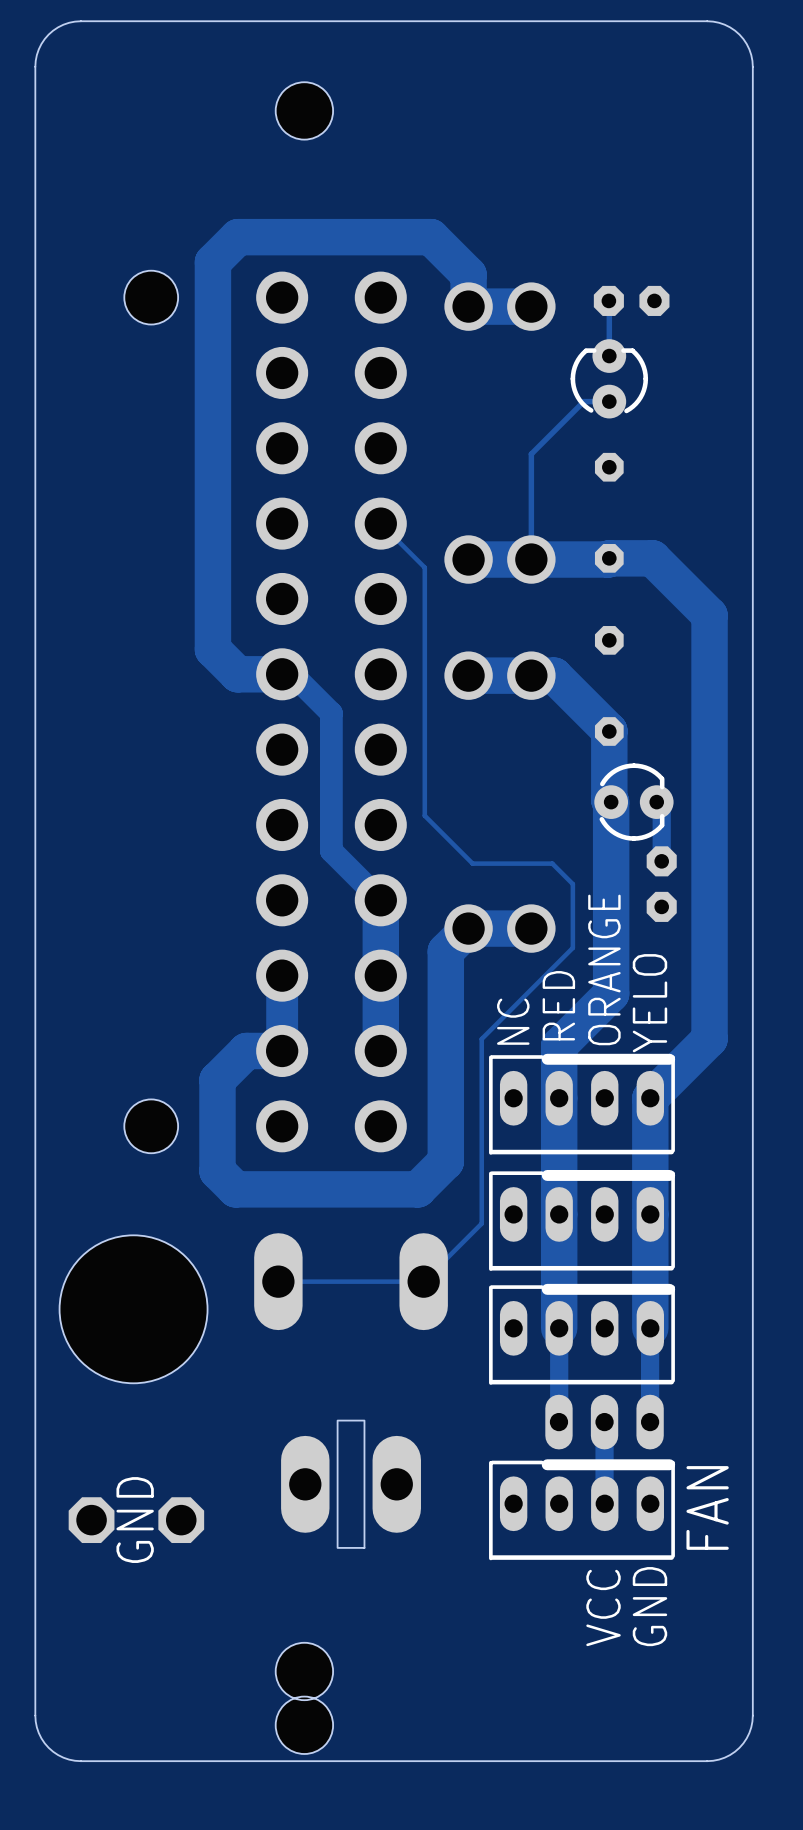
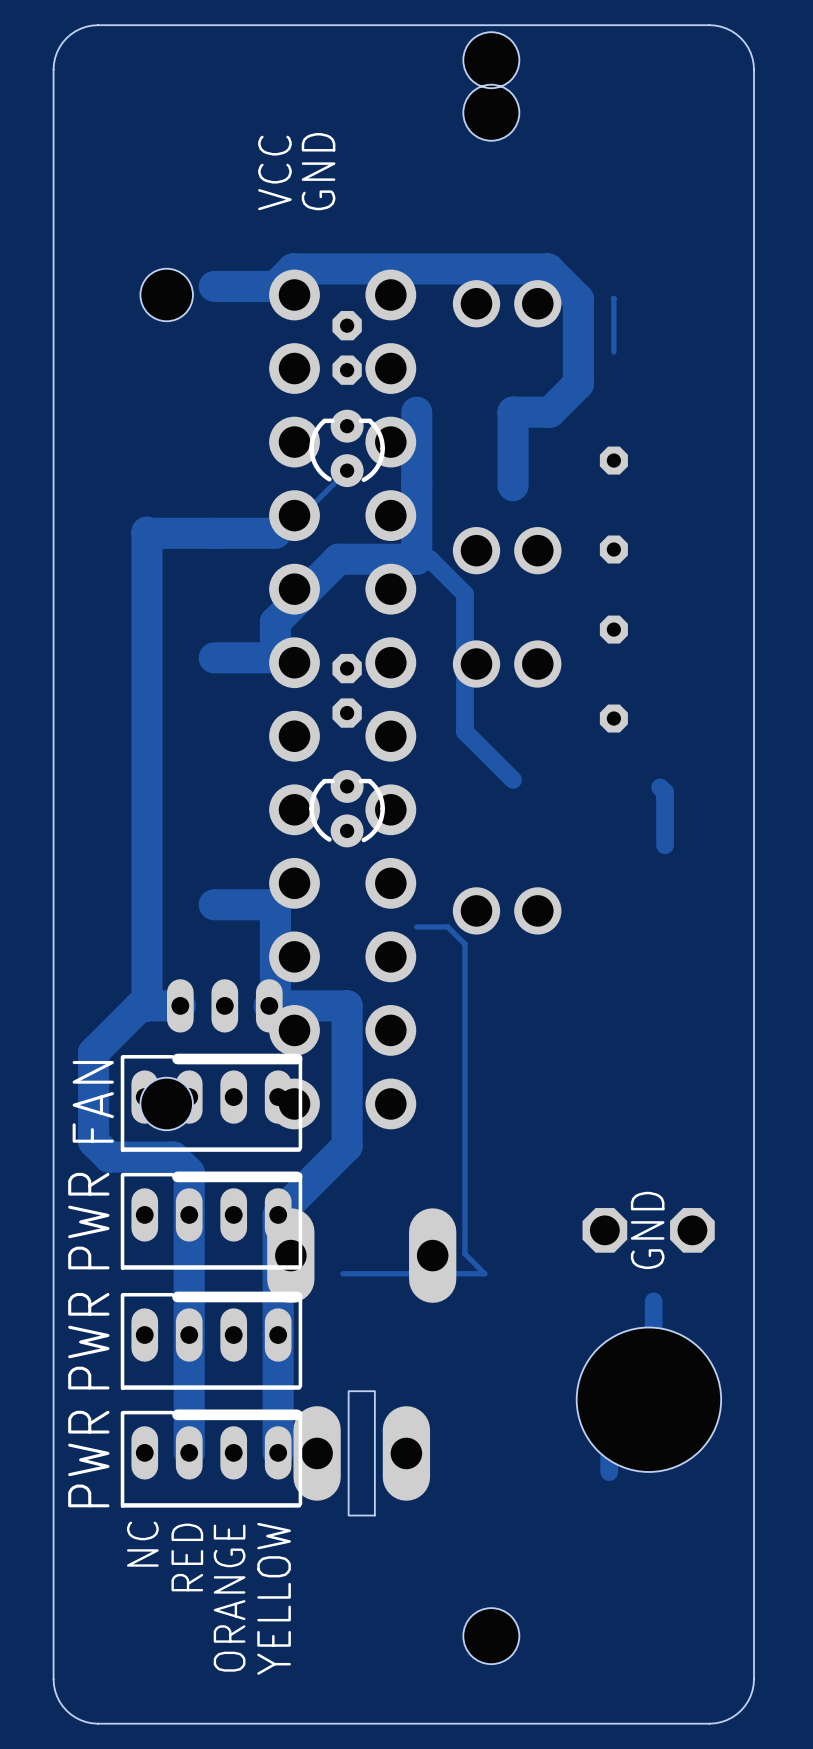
part: none -> (491, 60)
part: (304, 110) -> none
part: none -> (491, 112)
text: none -> GND (318, 171)
text: none -> VCC (274, 172)
track: none -> (214, 286) (275, 286) (292, 268) (548, 268) (578, 299) (578, 383) (550, 412) (513, 412) (513, 485)
part: (631, 300) -> none
track: (531, 306) (468, 306) (468, 274) (431, 237) (237, 237) (212, 262) (212, 649) (237, 674) (292, 674) (331, 713) (331, 850) (380, 900) (380, 1050) -> none
part: none -> (347, 347)
part: (609, 378) -> none
track: (609, 401) (583, 401) (531, 454) (531, 559) -> none
track: none -> (416, 412) (416, 559)
part: none -> (347, 448)
track: none -> (347, 470) (284, 533) (146, 532) (146, 1005)
track: (380, 523) (424, 567) (424, 815) (472, 863) (552, 863) (572, 884) (572, 947) (481, 1039) (481, 1223) (423, 1281) (278, 1281) -> none
track: (468, 559) (652, 558) (709, 615) (709, 1039) (650, 1098) (650, 1328) -> none
track: none -> (416, 559) (338, 559) (275, 622) (275, 657) (214, 657)
track: none -> (416, 559) (430, 559) (464, 594) (464, 731) (513, 779)
track: (468, 675) (554, 675) (609, 730) (611, 993) (559, 1045) (559, 1421) -> none
part: none -> (347, 690)
part: (633, 802) -> none
part: none -> (347, 808)
part: (661, 884) -> none
track: none -> (214, 904) (275, 904) (275, 999) (269, 1005) (347, 1005) (347, 1145) (278, 1214) (278, 1452)
track: (531, 928) (468, 928) (445, 951) (445, 1161) (417, 1189) (235, 1189) (217, 1171) (217, 1080) (246, 1050) (282, 1050) (282, 975) -> none
track: none -> (416, 926) (447, 926) (464, 944) (464, 1253) (484, 1273) (342, 1273)
text: ORANGE (604, 969) -> none
text: YELO (649, 1003) -> none
text: RED (558, 1005) -> none
text: NC (513, 1021) -> none
track: none -> (180, 1005) (140, 1005) (93, 1052) (93, 1141) (109, 1157) (173, 1157) (189, 1172) (189, 1452)
part: none -> (224, 1005)
part: (582, 1104) -> none
text: none -> FAN (93, 1101)
part: none -> (211, 1102)
part: (582, 1220) -> none
text: none -> PWR (88, 1221)
part: none -> (211, 1220)
part: none -> (604, 1230)
text: none -> GND (647, 1230)
part: none -> (692, 1230)
hole: (133, 1309) -> none
part: (582, 1334) -> none
text: none -> PWR (88, 1341)
part: none -> (211, 1340)
part: (604, 1422) -> none
hole: none -> (648, 1399)
part: none -> (211, 1458)
text: none -> PWR (88, 1459)
text: FAN (707, 1507) -> none
part: (582, 1509) -> none
part: (91, 1520) -> none
text: GND (135, 1520) -> none
part: (181, 1520) -> none
text: none -> NC (142, 1544)
text: none -> RED (187, 1557)
text: GND (649, 1606) -> none
text: VCC (603, 1607) -> none
text: none -> ORANGE (229, 1598)
text: none -> YELLOW (274, 1598)
part: (304, 1671) -> none
part: none -> (491, 1636)
part: (304, 1725) -> none

